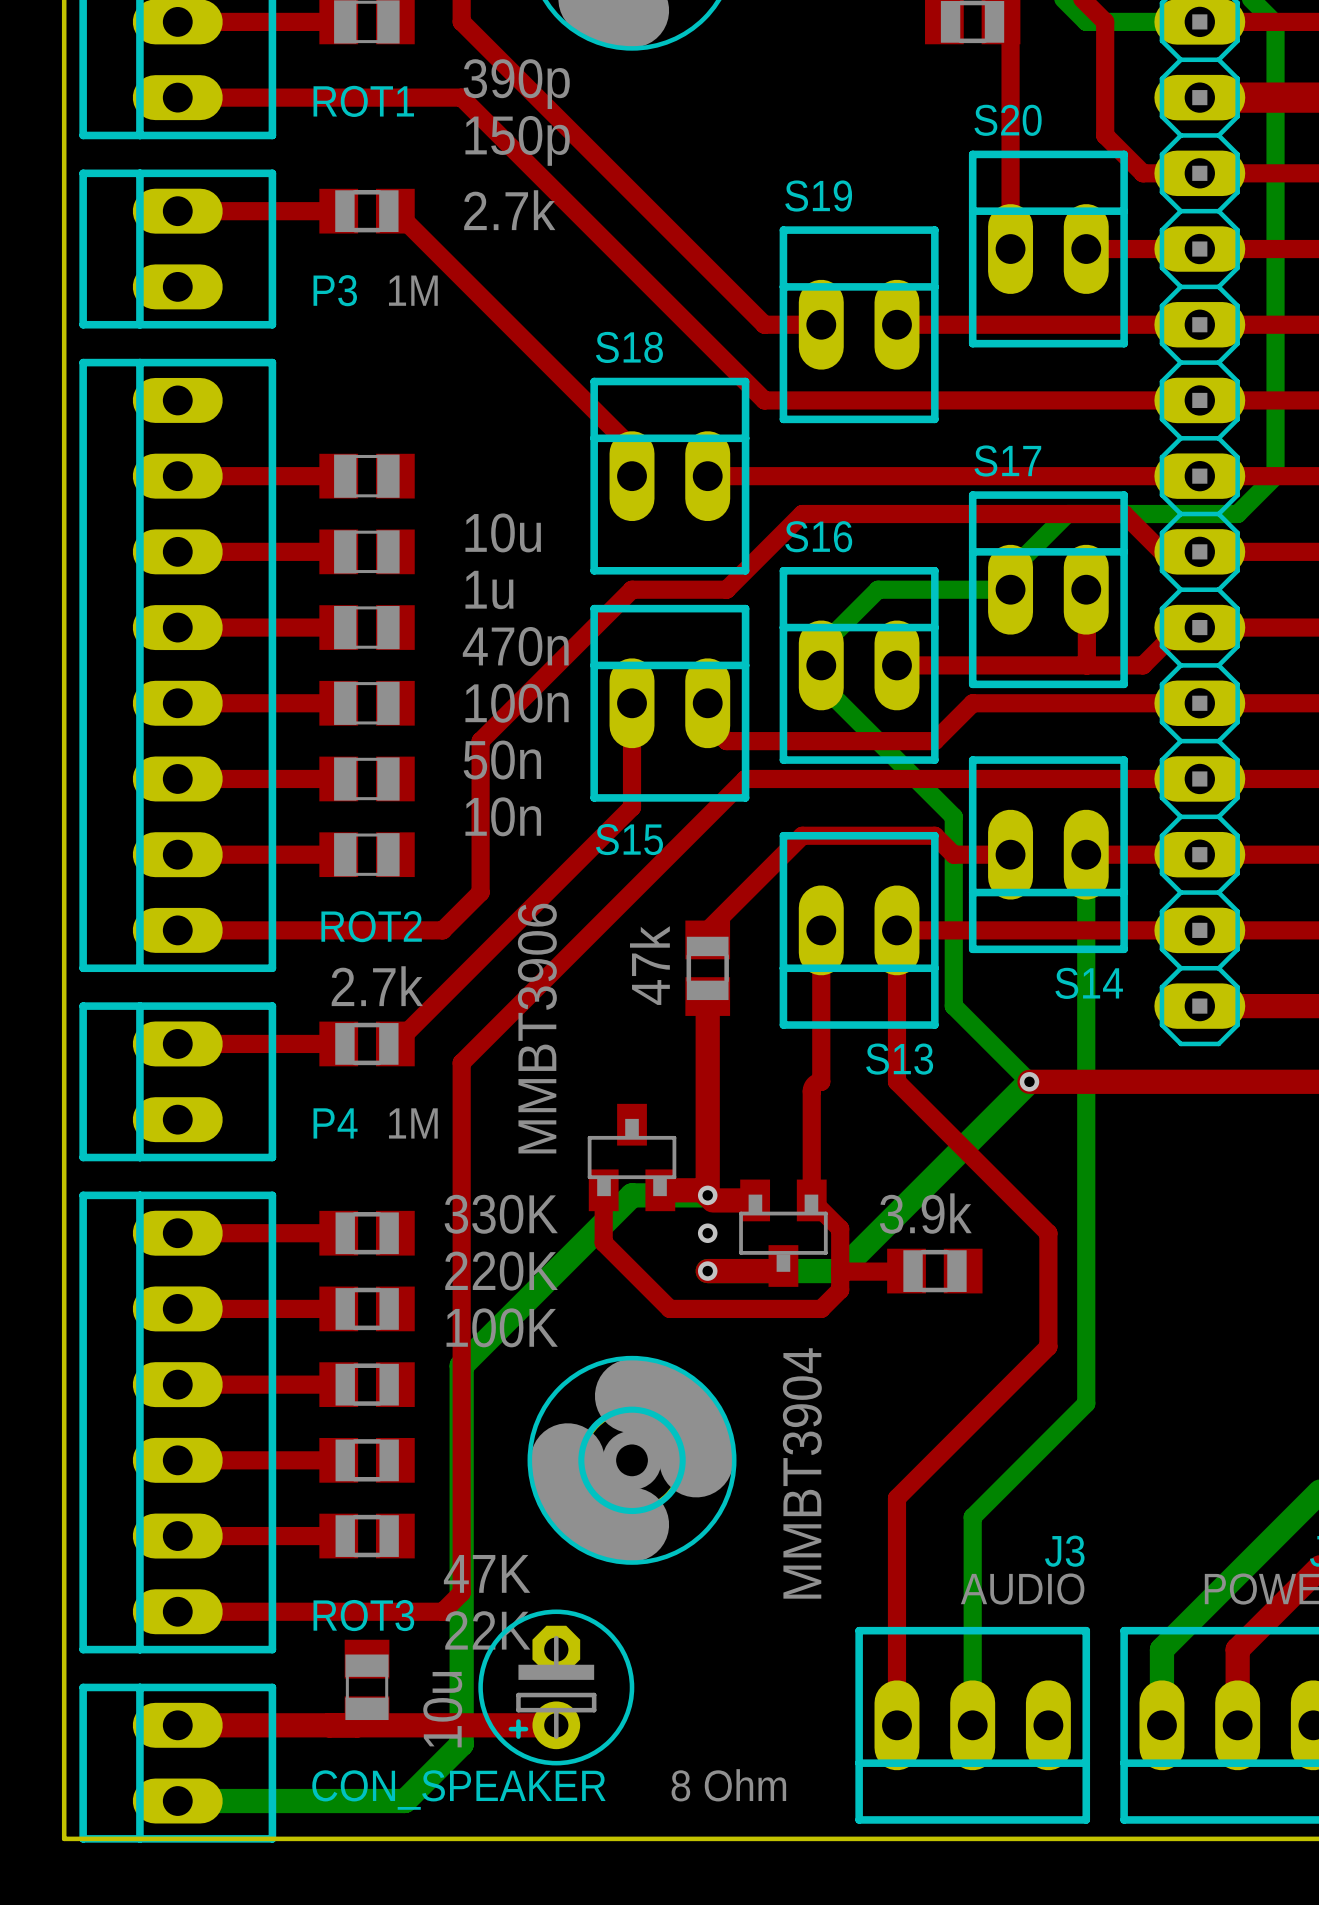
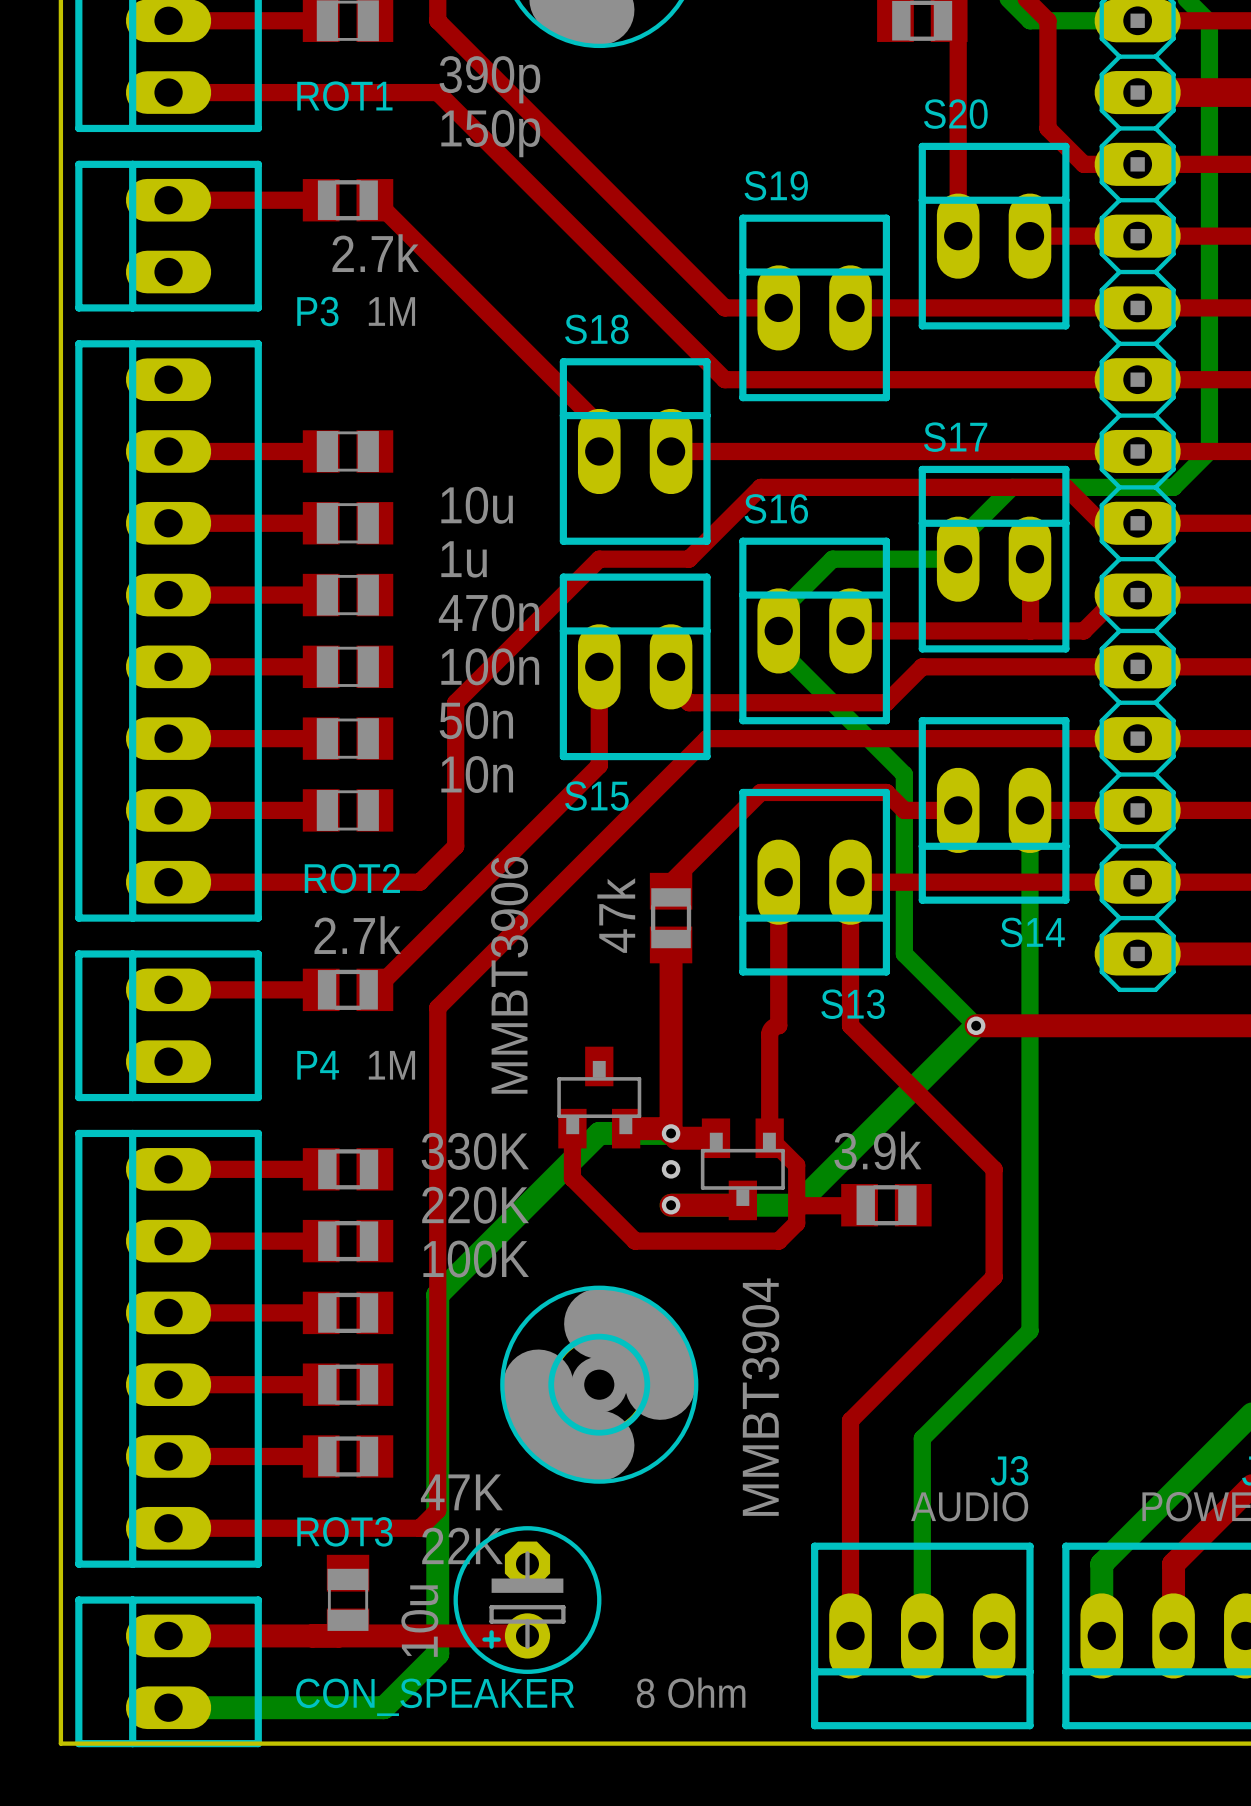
part value position: 2.7k (509, 210) -> 2.7k (375, 253)
P3 name position: P3 (335, 290) -> P3 (317, 311)
P3 value position: 1M (413, 290) -> 1M (391, 311)

